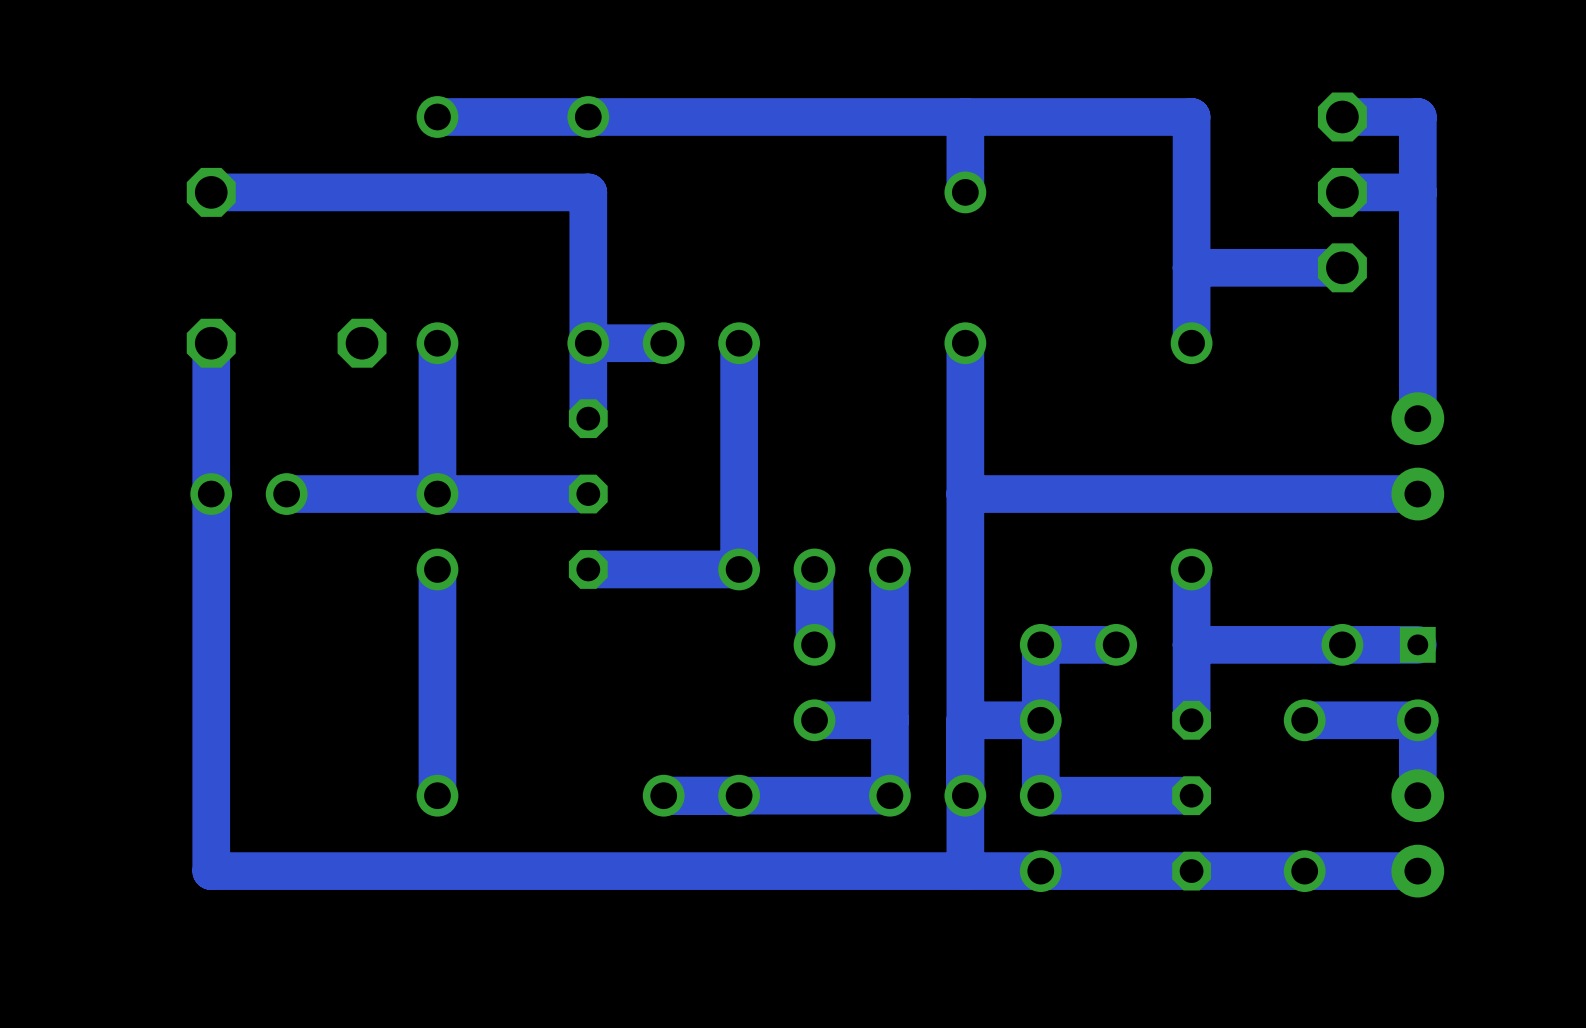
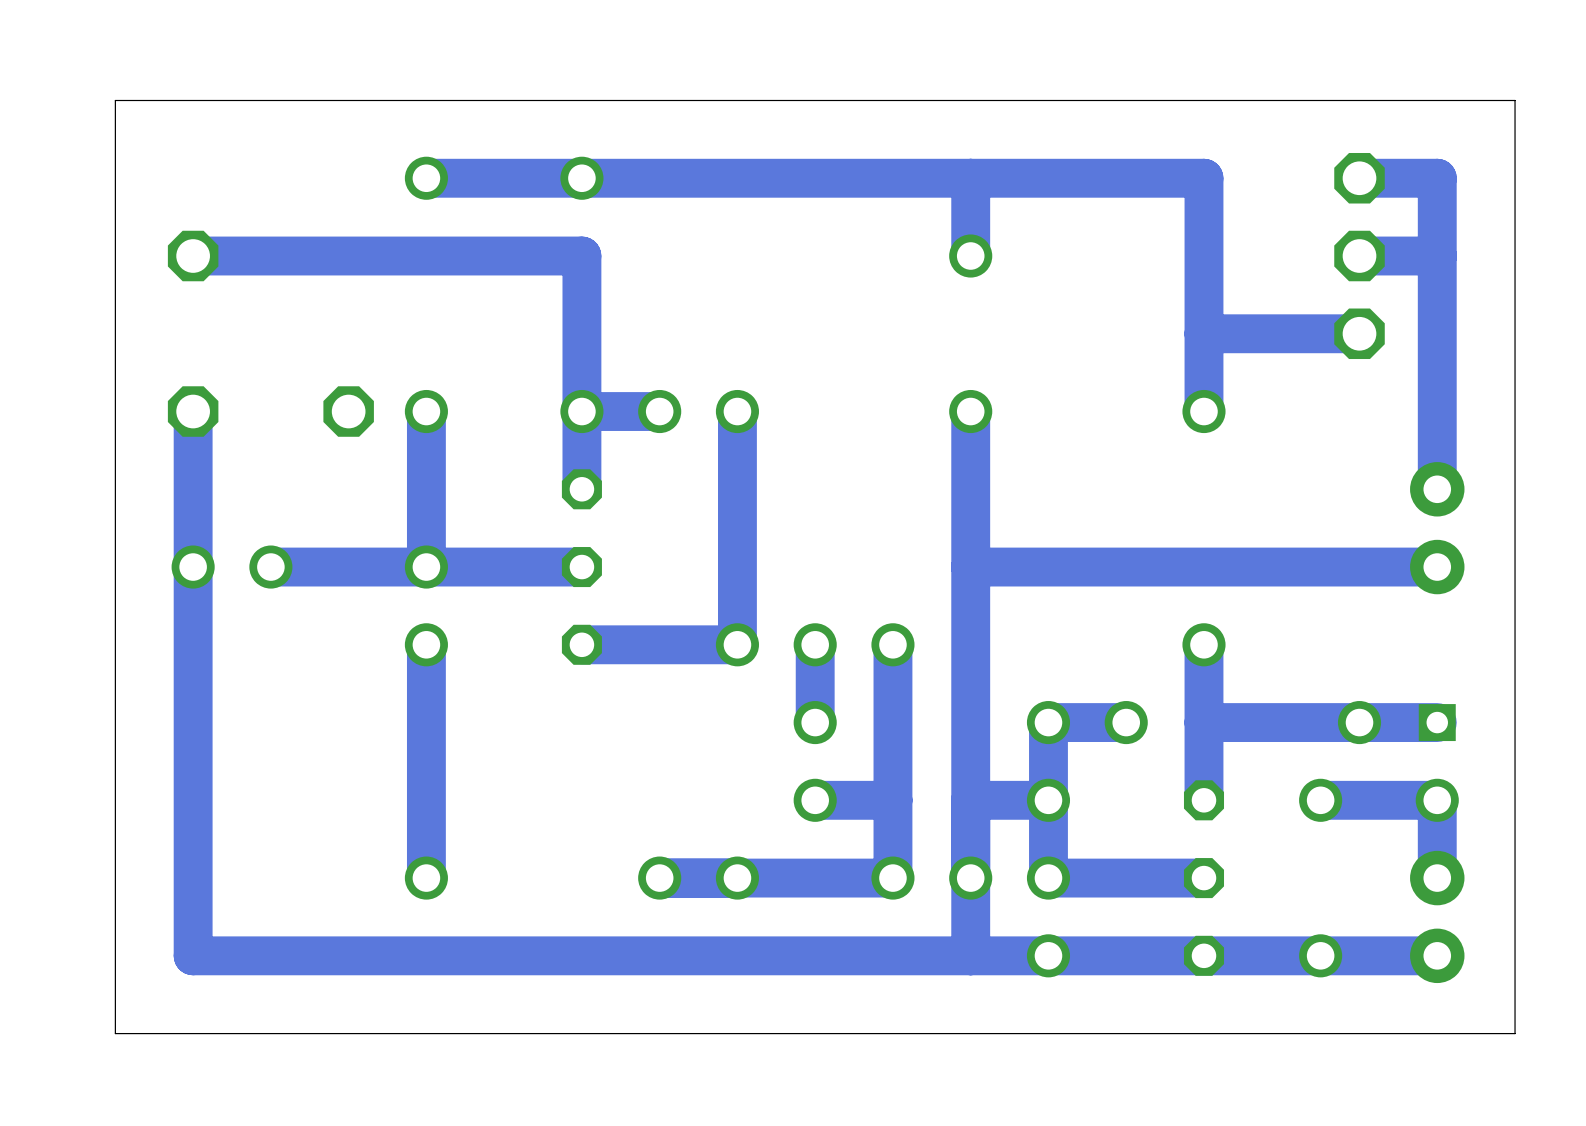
board edge: none -> (1515, 100) (115, 100) (115, 1033) (1515, 1033) (1515, 100)

